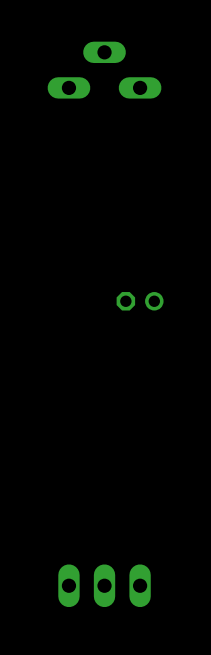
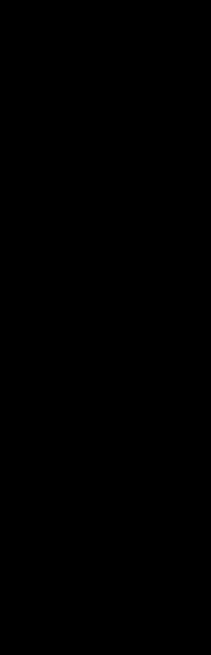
part: (104, 70) -> none
part: (140, 301) -> none
part: (104, 585) -> none

